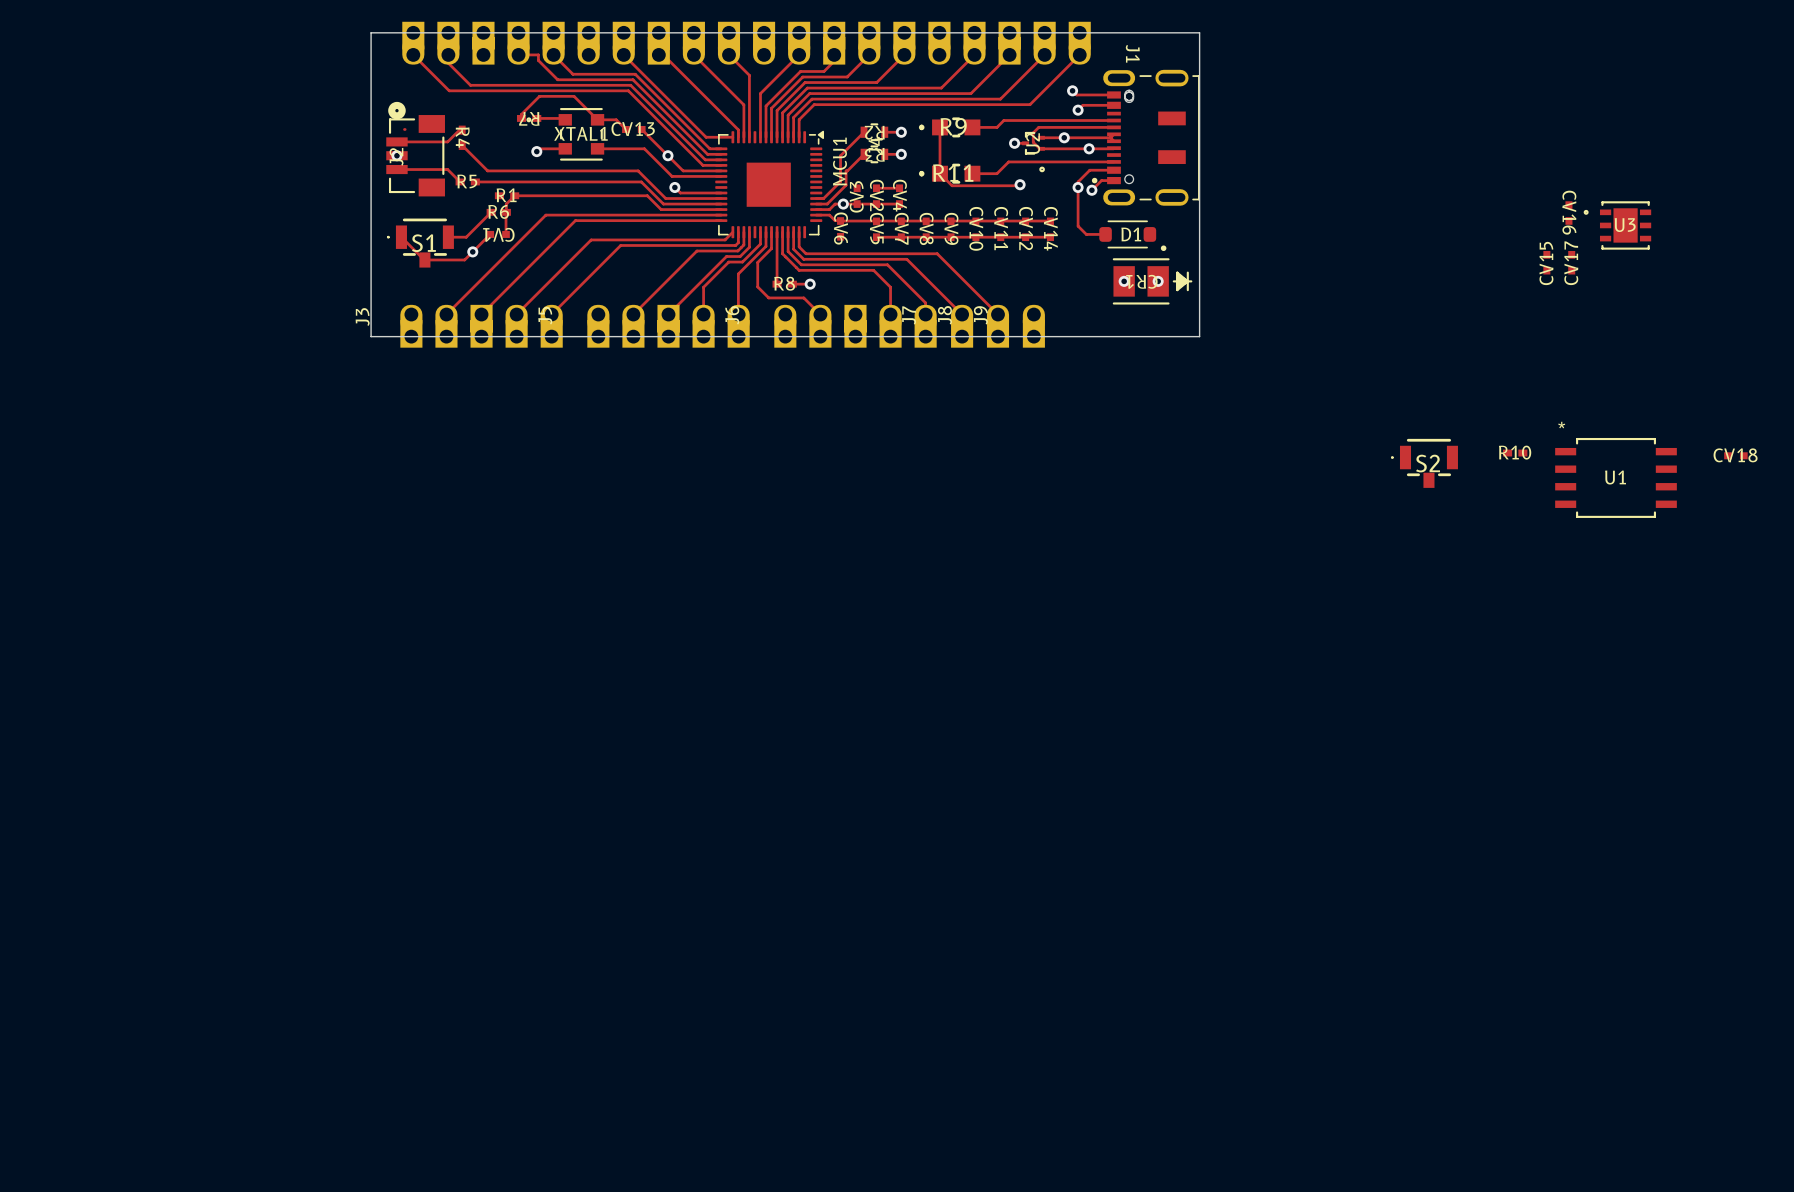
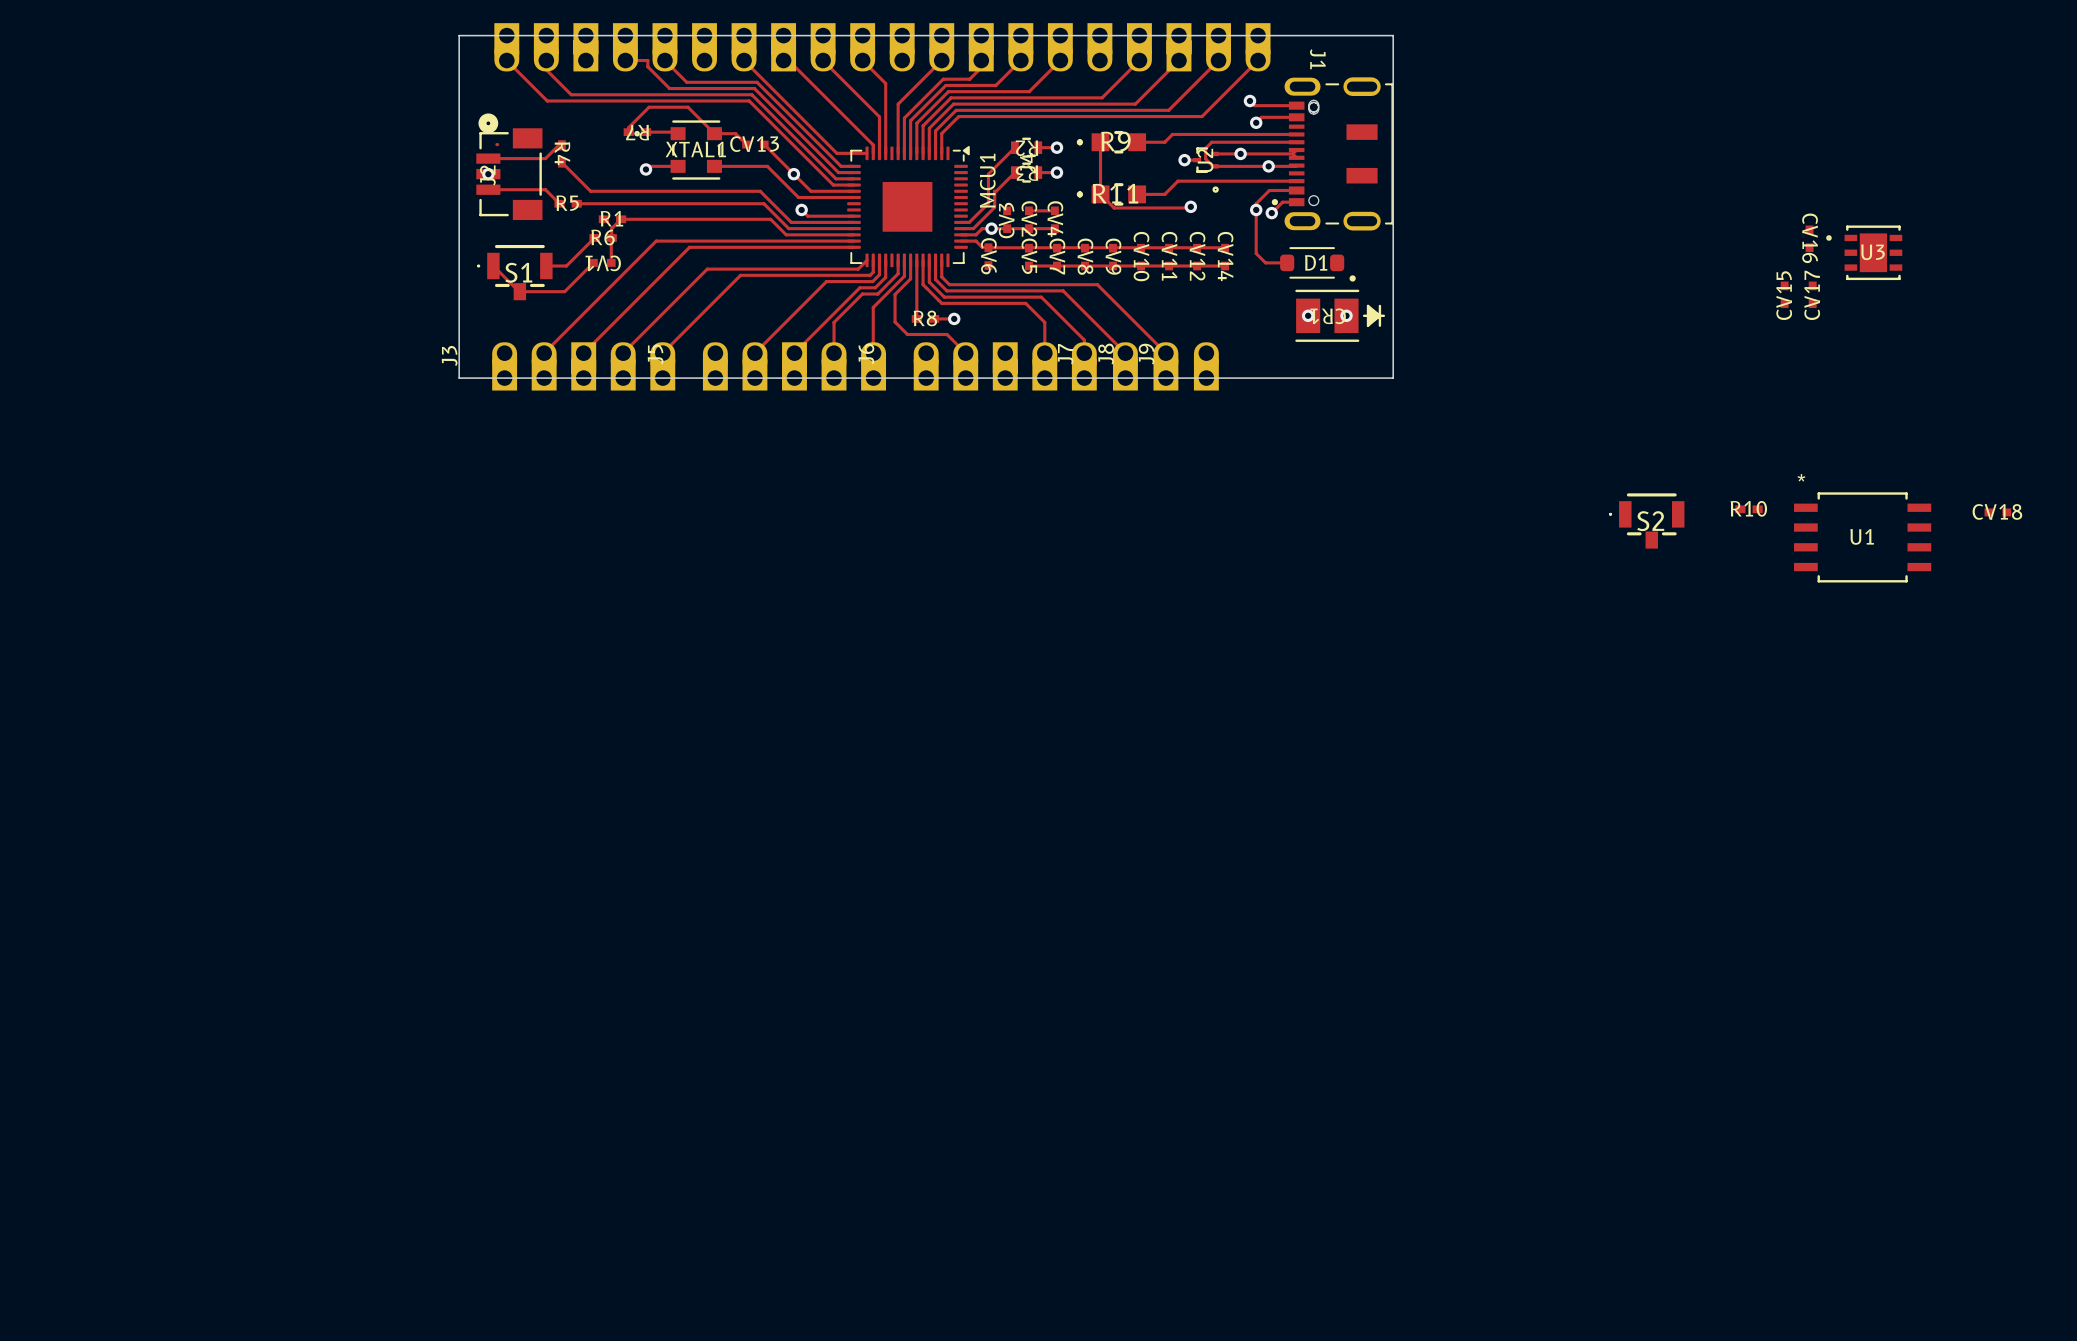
via: (472, 251) -> none

